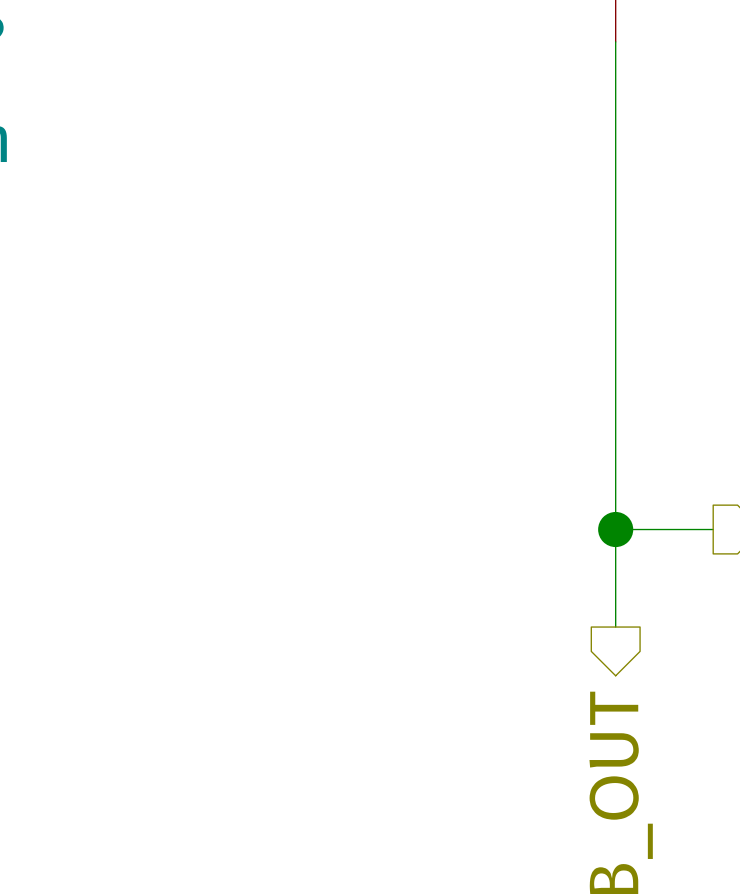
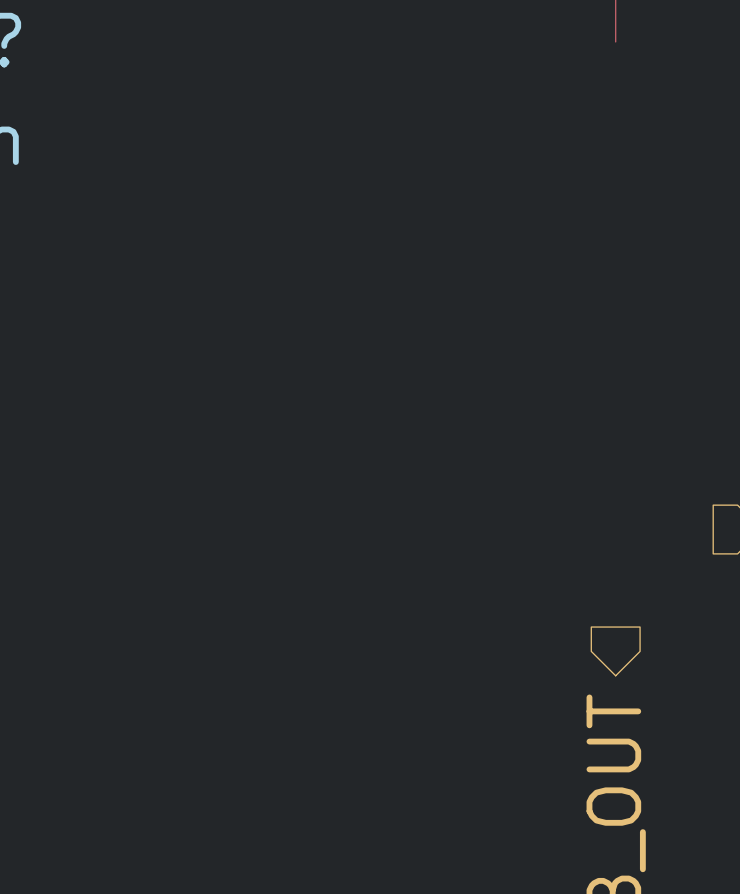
wire: (615, 41) (615, 627) -> none
wire: (615, 529) (713, 529) -> none
junction: (615, 529) -> none

